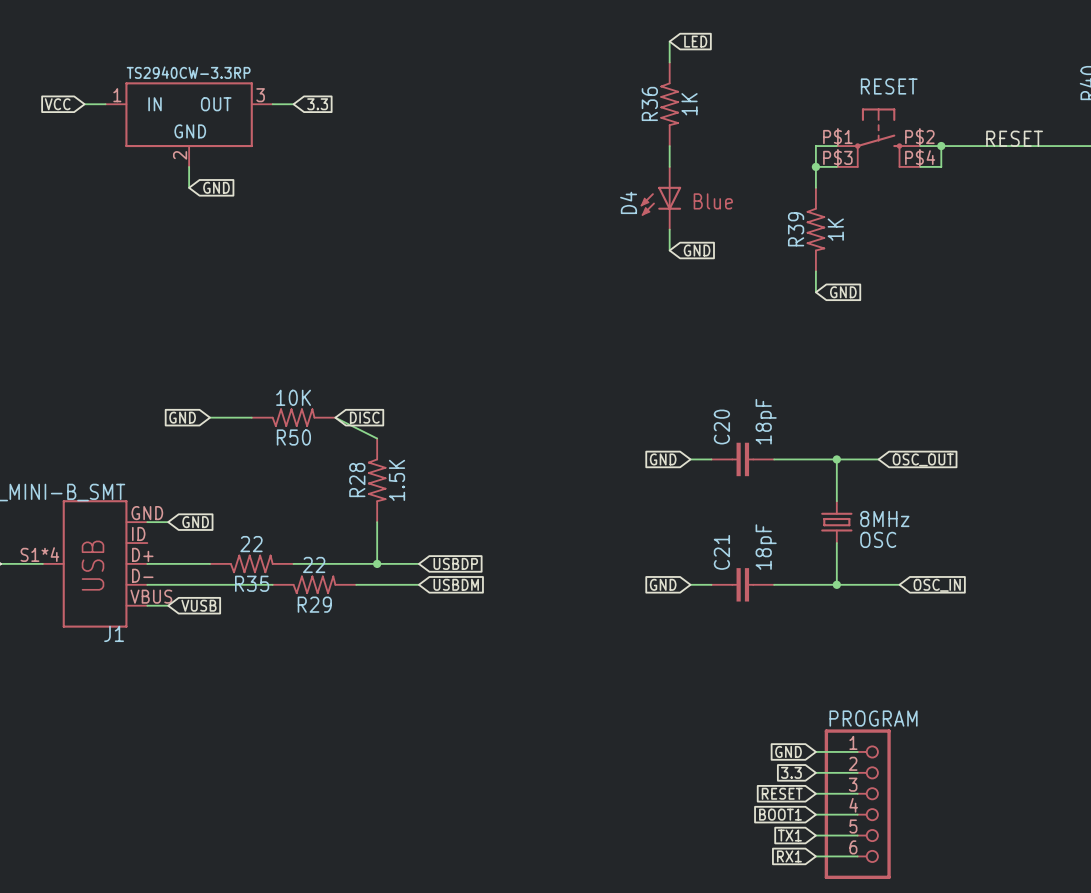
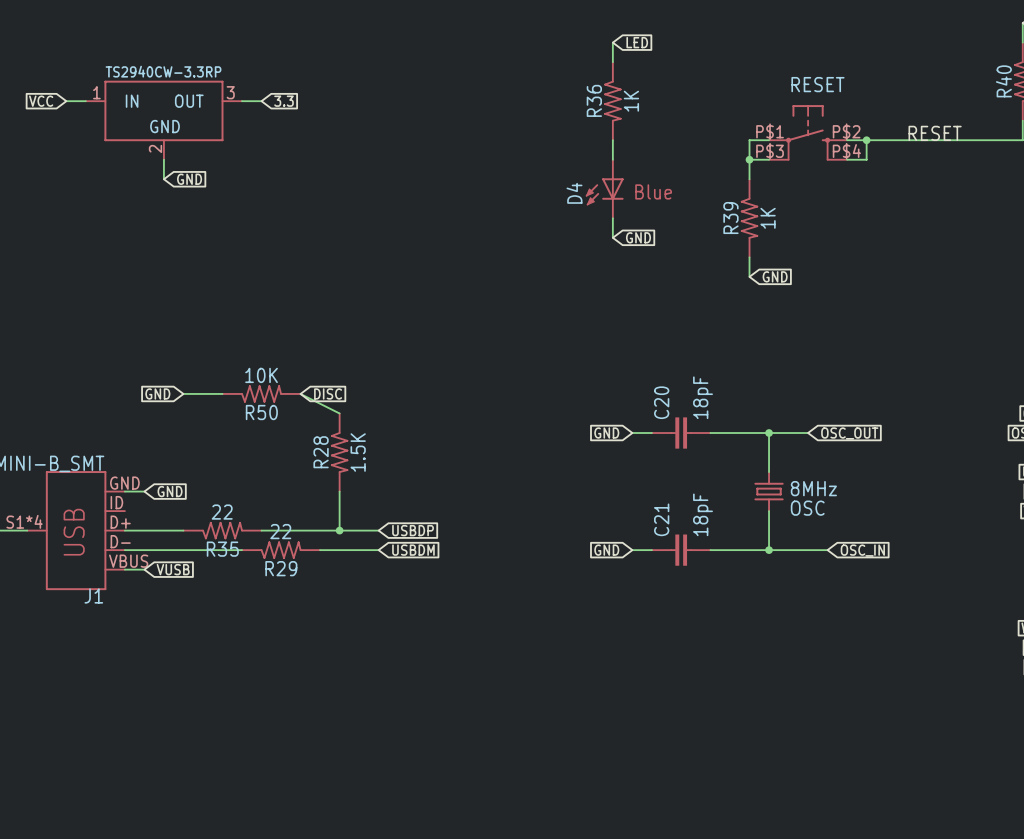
global label: GND (788, 751) -> none
wire: (815, 751) (857, 751) -> none
global label: 3.3 (791, 772) -> none
wire: (815, 772) (857, 772) -> none
global label: RESET (782, 793) -> none
wire: (815, 793) (857, 793) -> none
PROGRAM: (857, 804) -> none
global label: BOOT1 (780, 814) -> none
wire: (815, 814) (857, 814) -> none
global label: TX1 (789, 835) -> none
wire: (815, 835) (857, 835) -> none
global label: RX1 (789, 856) -> none
wire: (815, 856) (857, 856) -> none

